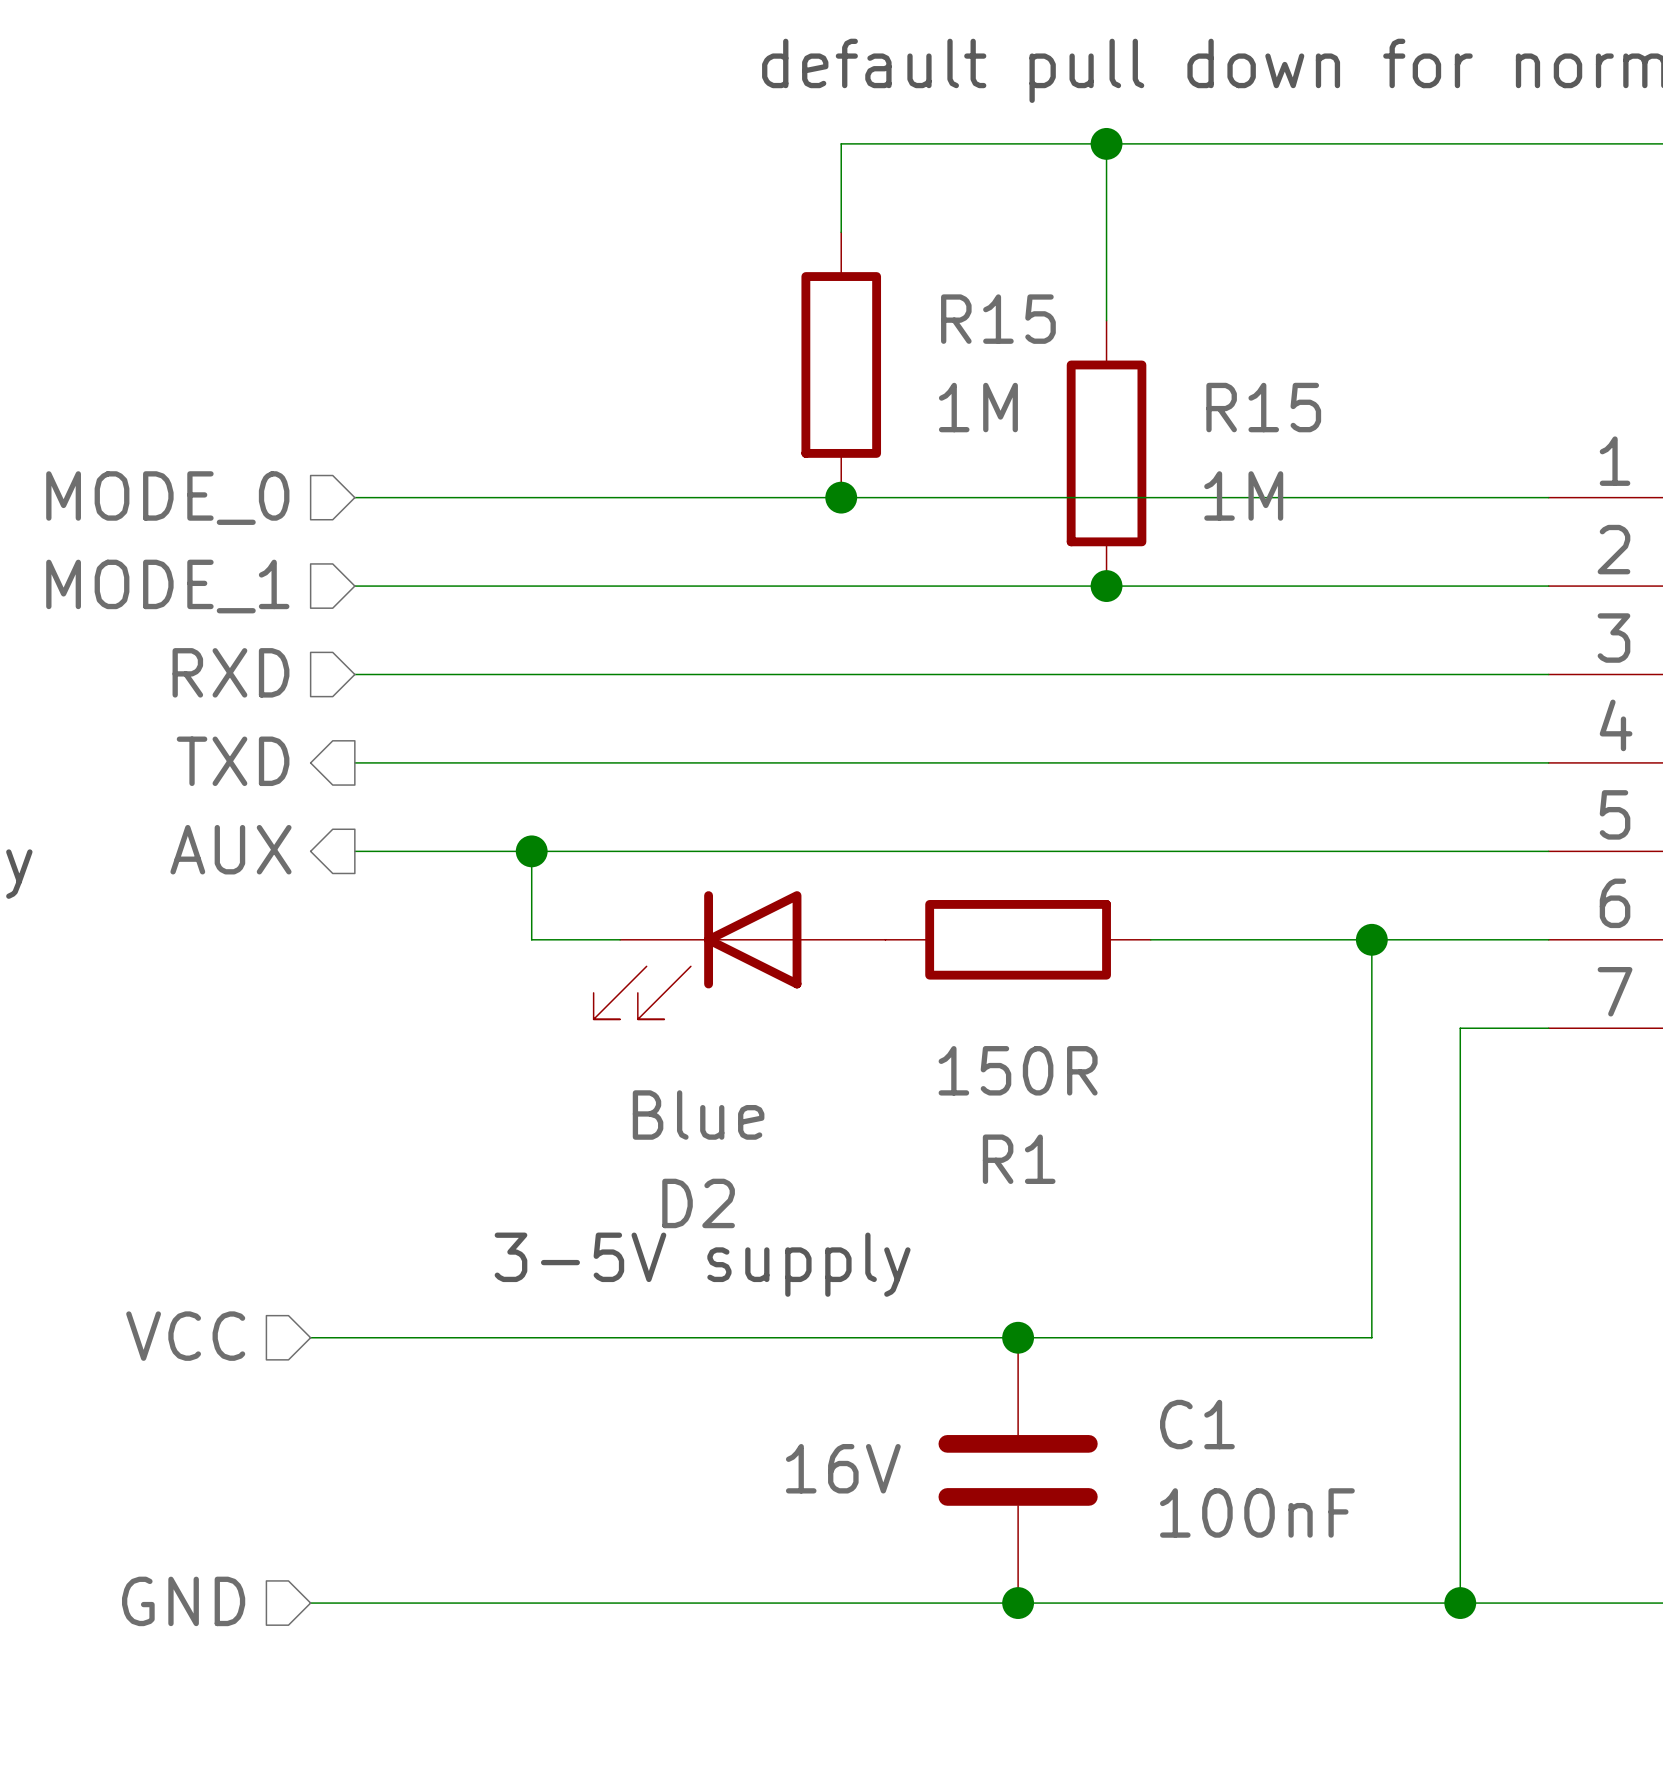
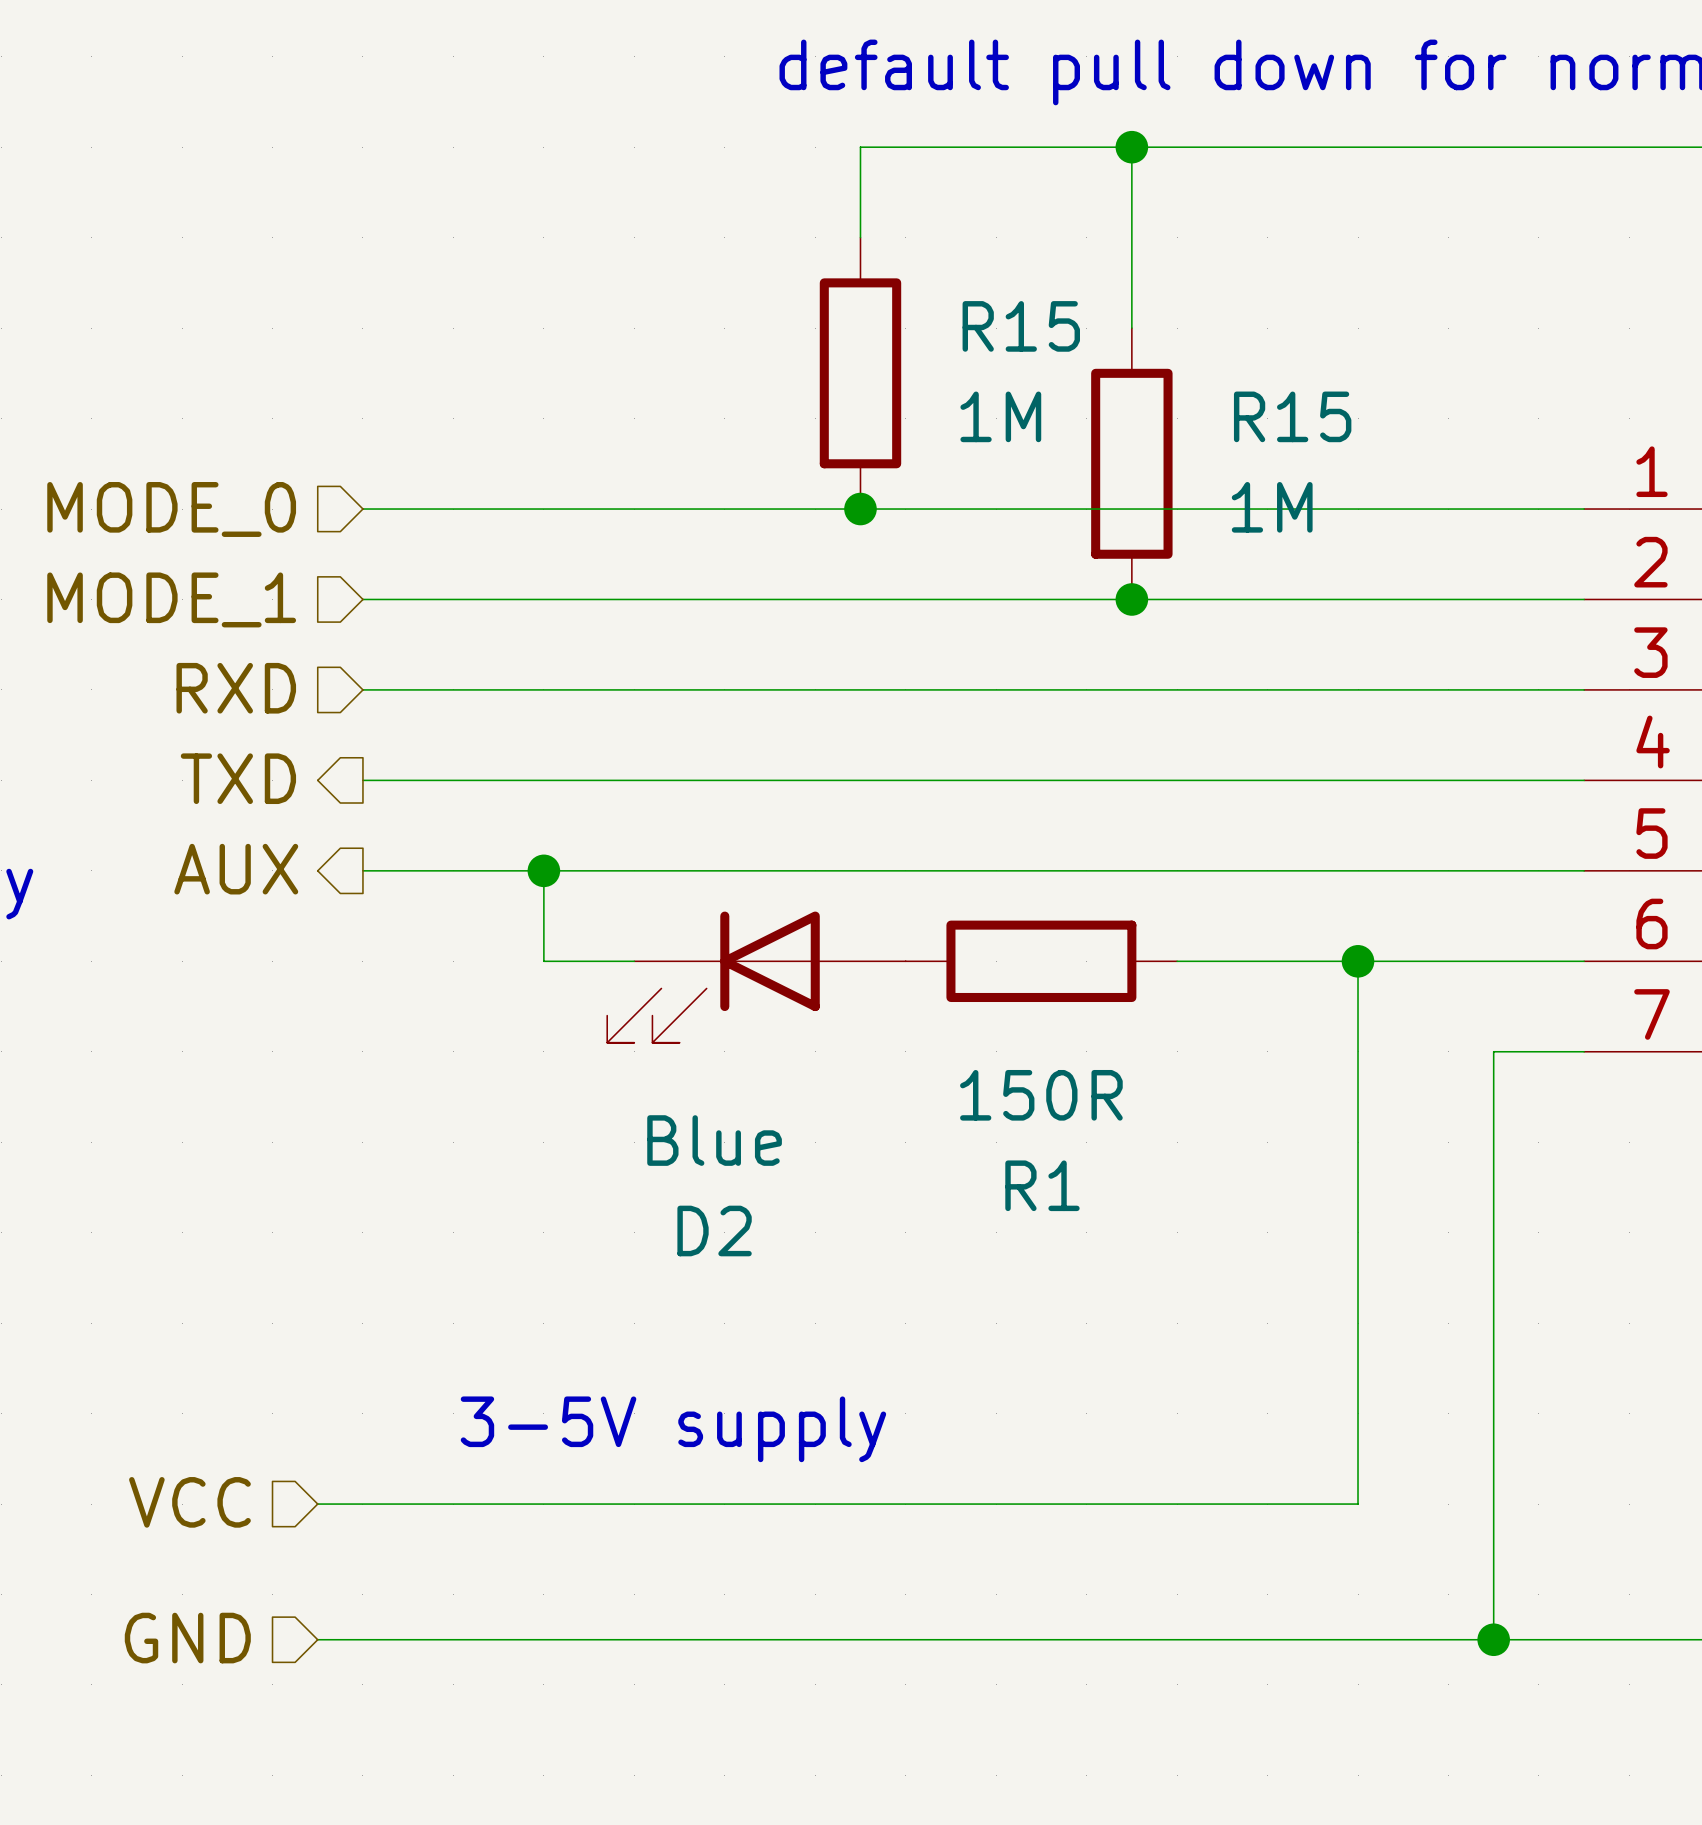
wire: none -> (1358, 961) (1358, 1504) (317, 1504)
wire: (1371, 939) (1371, 1337) (310, 1337) -> none
junction position: (1371, 939) -> (1358, 961)
text position: 3-5V supply (702, 1264) -> 3-5V supply (673, 1429)
hierarchical label position: VCC (185, 1336) -> VCC (189, 1502)
junction: (1018, 1337) -> none
C1: 100nF (1018, 1470) -> none
junction: (1018, 1603) -> none

